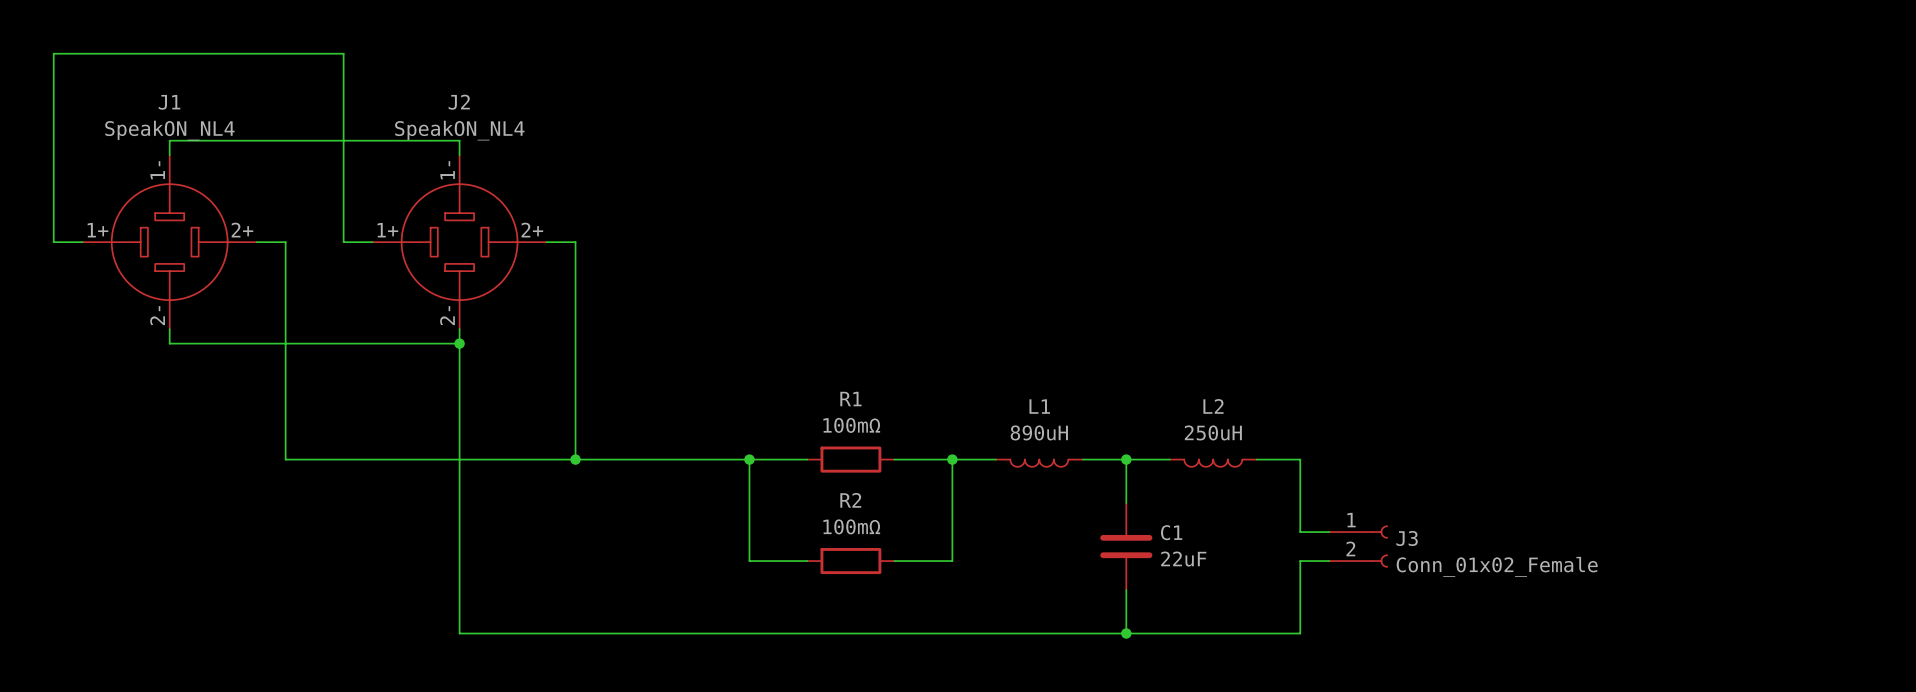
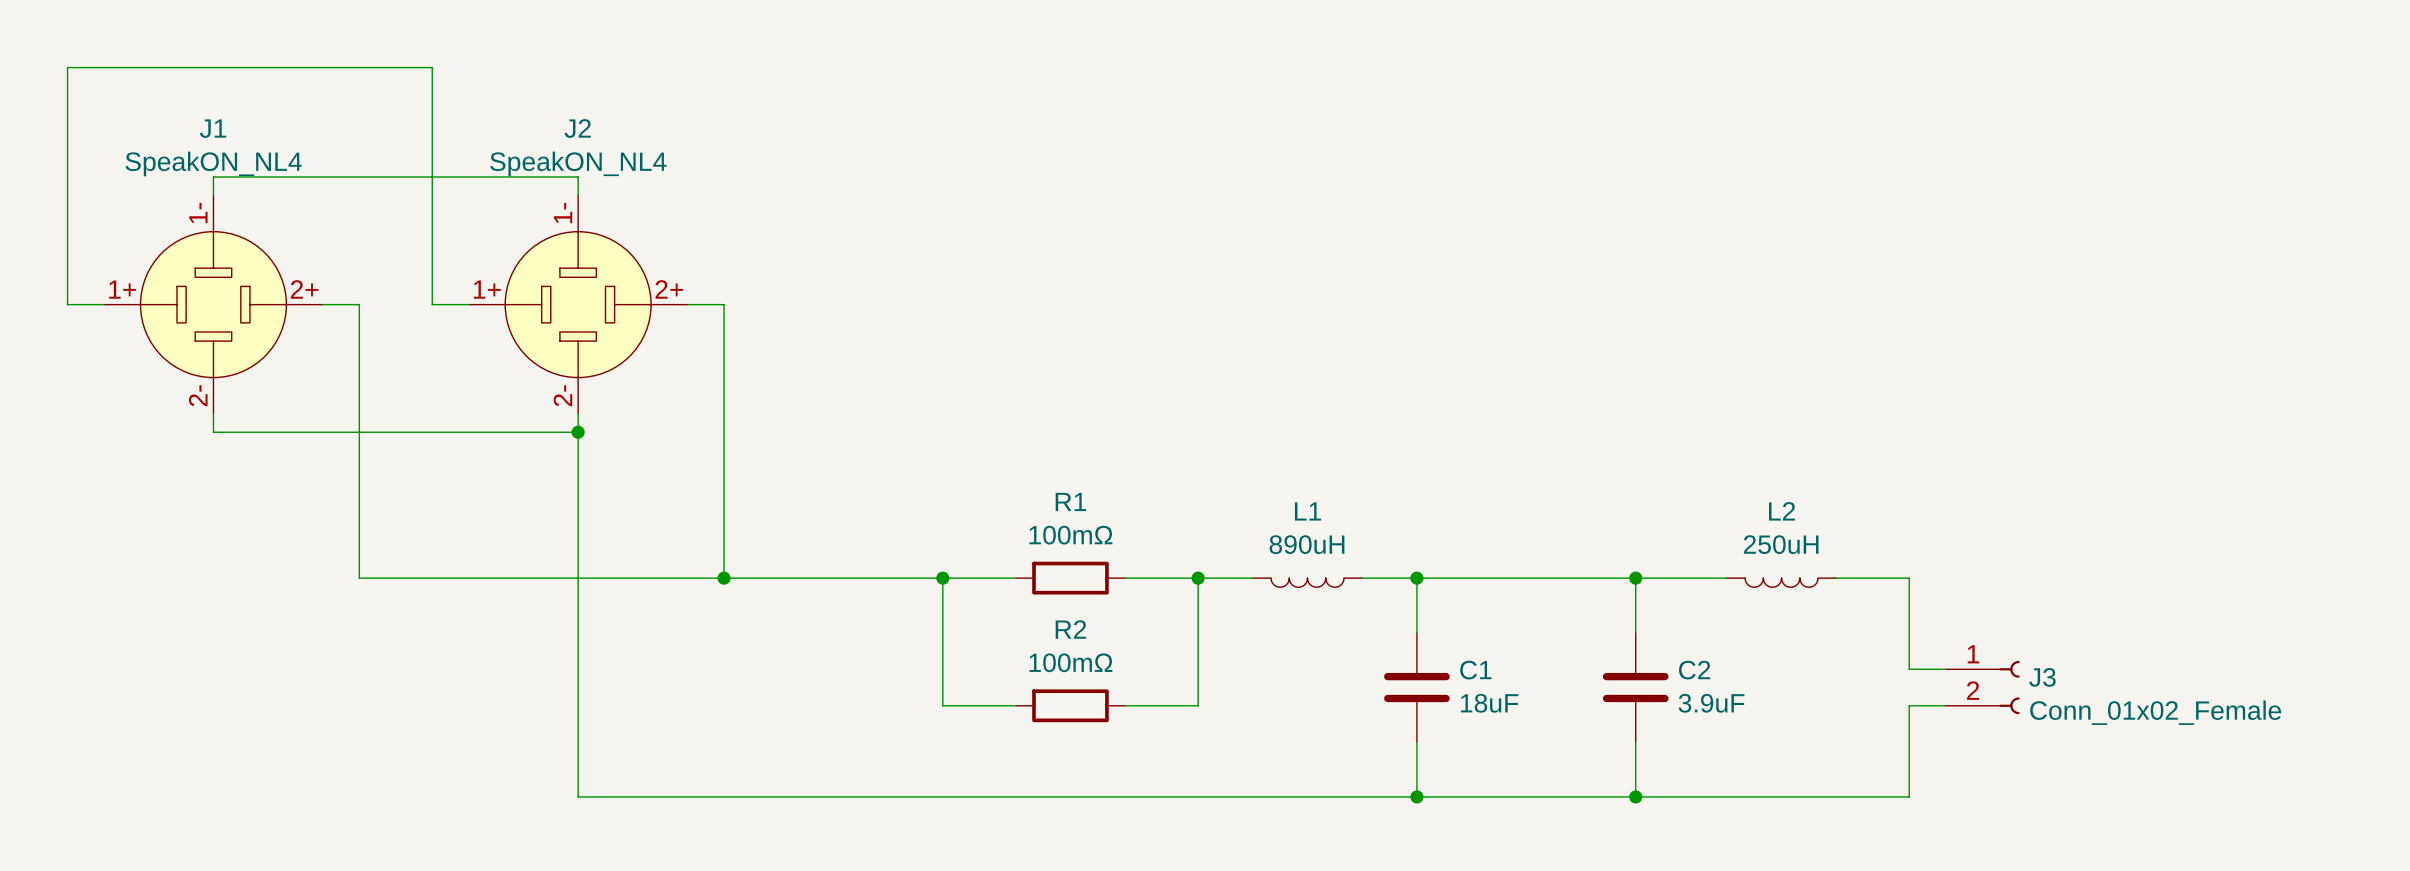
wire: none -> (1471, 578) (1581, 578)
wire: none -> (1635, 578) (1726, 578)
junction: none -> (1635, 578)
wire: none -> (1836, 578) (1909, 578) (1909, 669) (1945, 669)
L2 position: (1213, 463) -> (1781, 582)
wire: (1300, 503) (1300, 532) (1329, 532) -> none
C2: none -> 3.9uF (1635, 687)
J3 position: (1358, 546) -> (1982, 687)
C1 value: 22uF (1183, 559) -> 18uF (1489, 703)
wire: (1329, 561) (1300, 561) (1300, 590) -> none
wire: none -> (1945, 705) (1909, 705) (1909, 796) (1635, 796)
junction: none -> (1635, 796)

